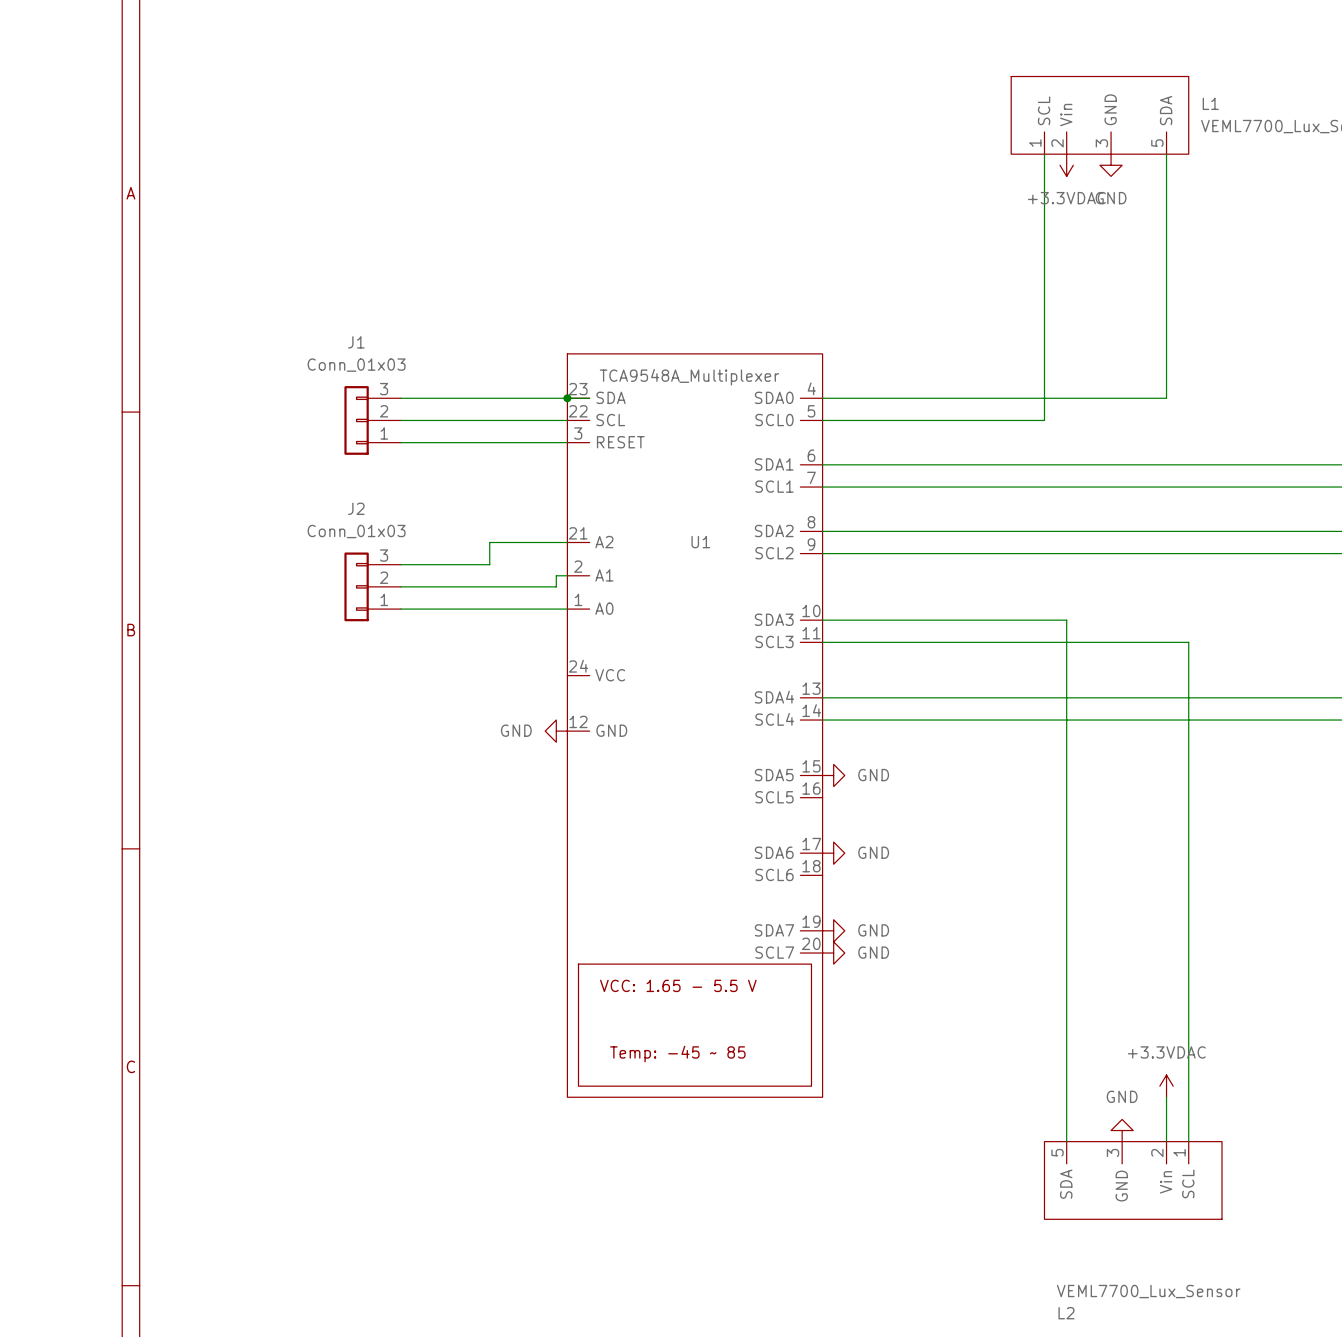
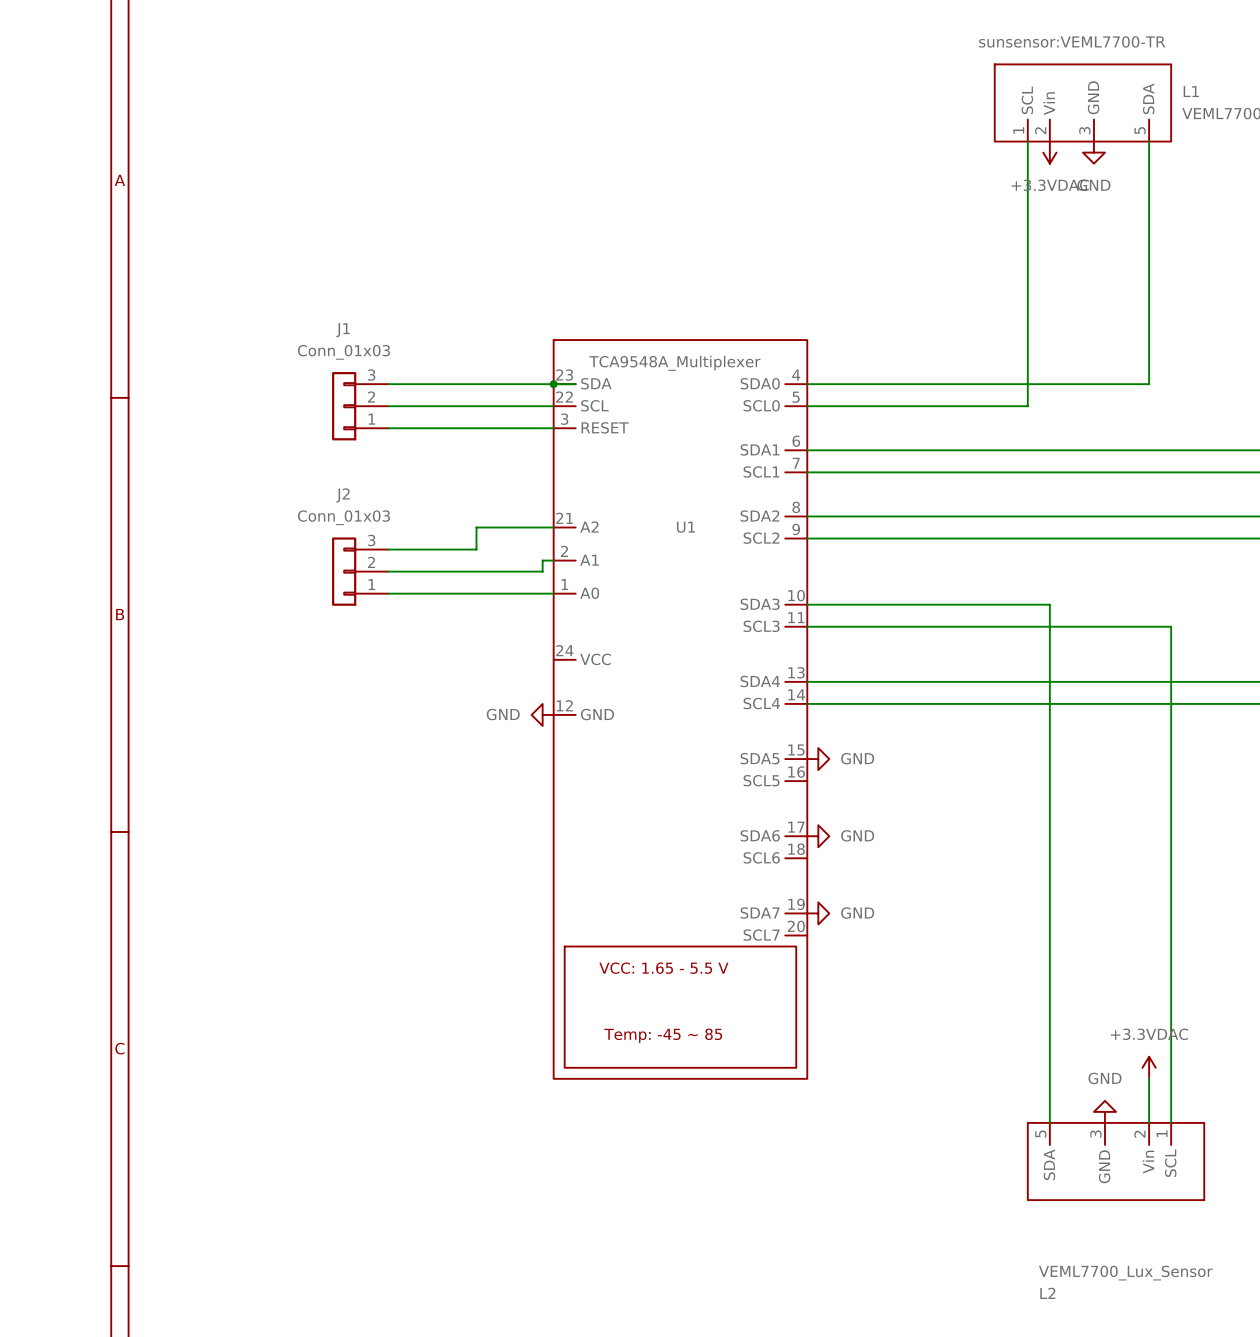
L1 text: none -> sunsensor:VEML7700-TR (1072, 41)
power symbol: GND (833, 953) -> none

